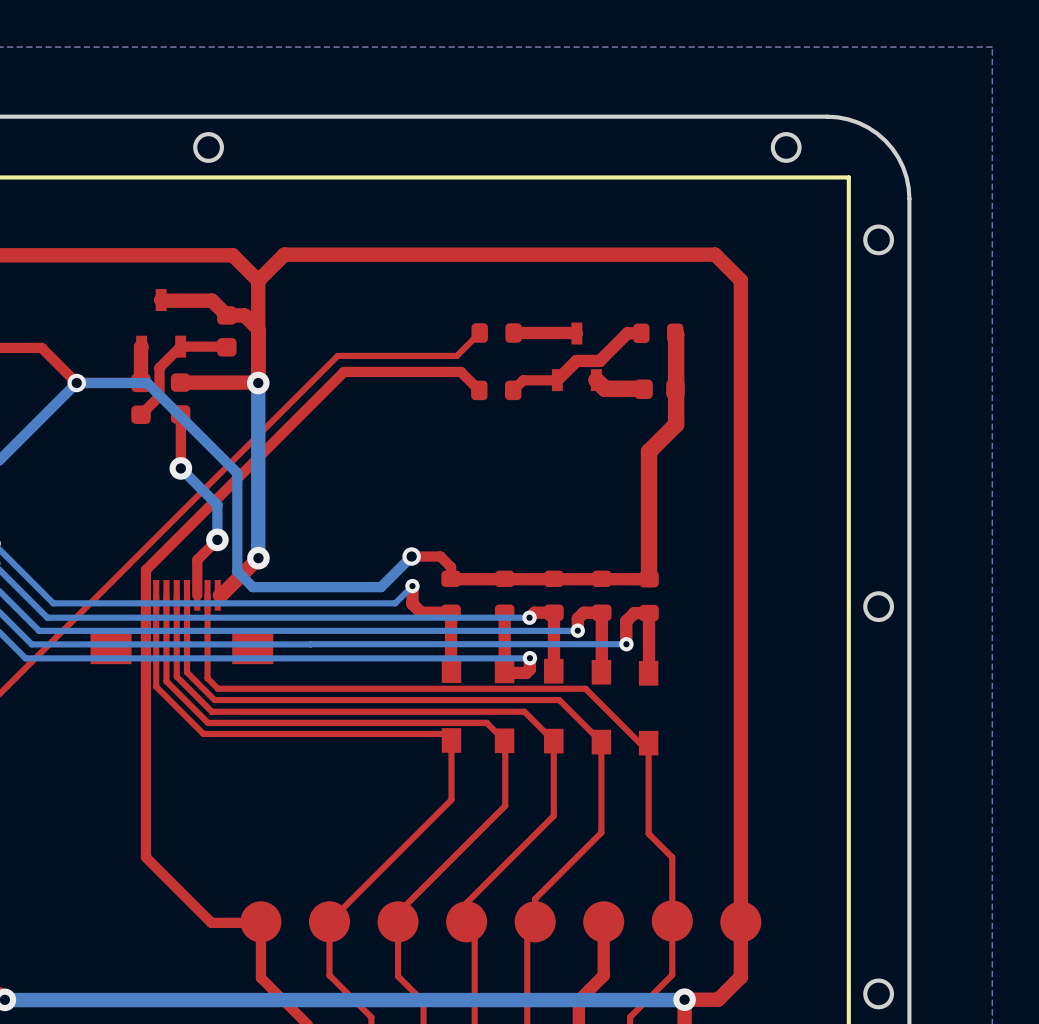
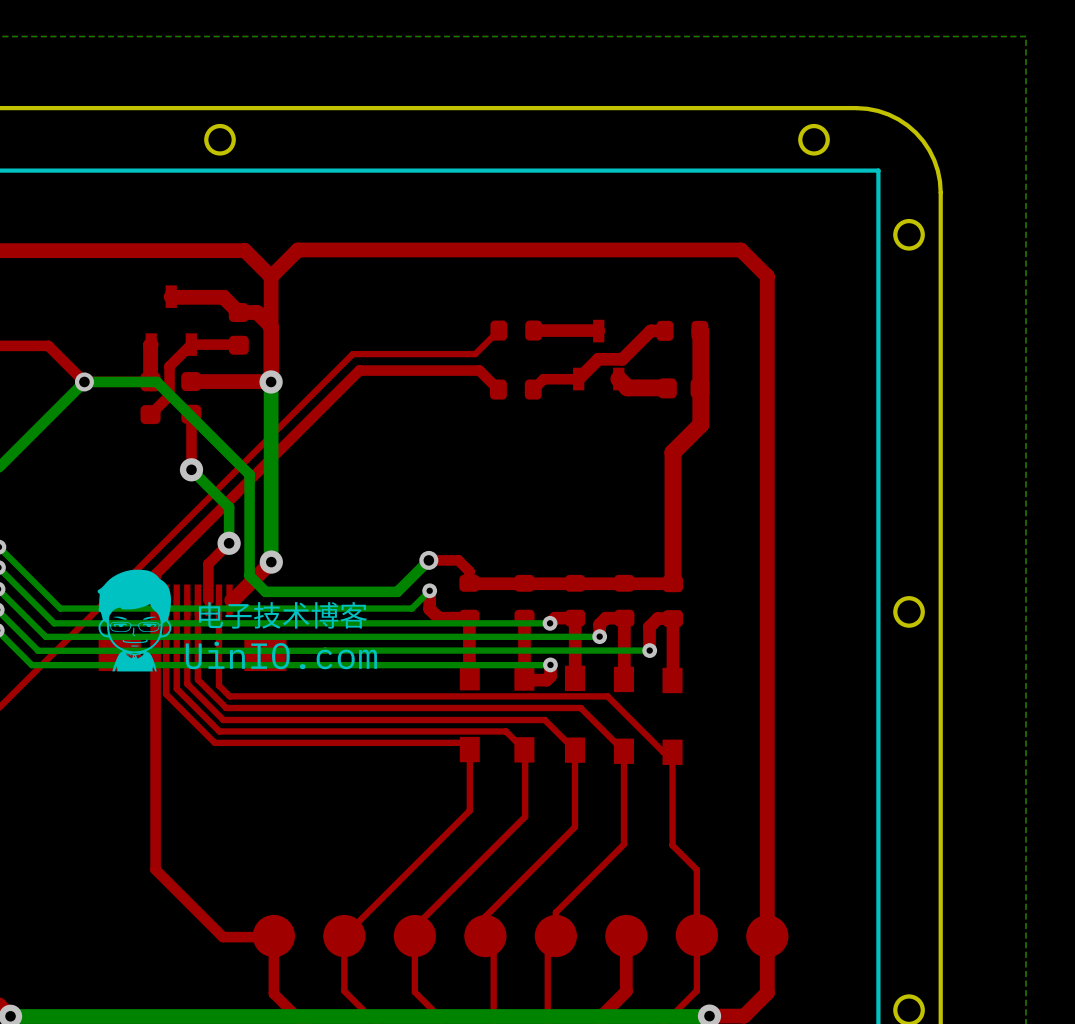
drawing: none -> [97, 569, 172, 672]
text: none -> 电子技术博客 (283, 615)
text: none -> UinIO.com (281, 655)

